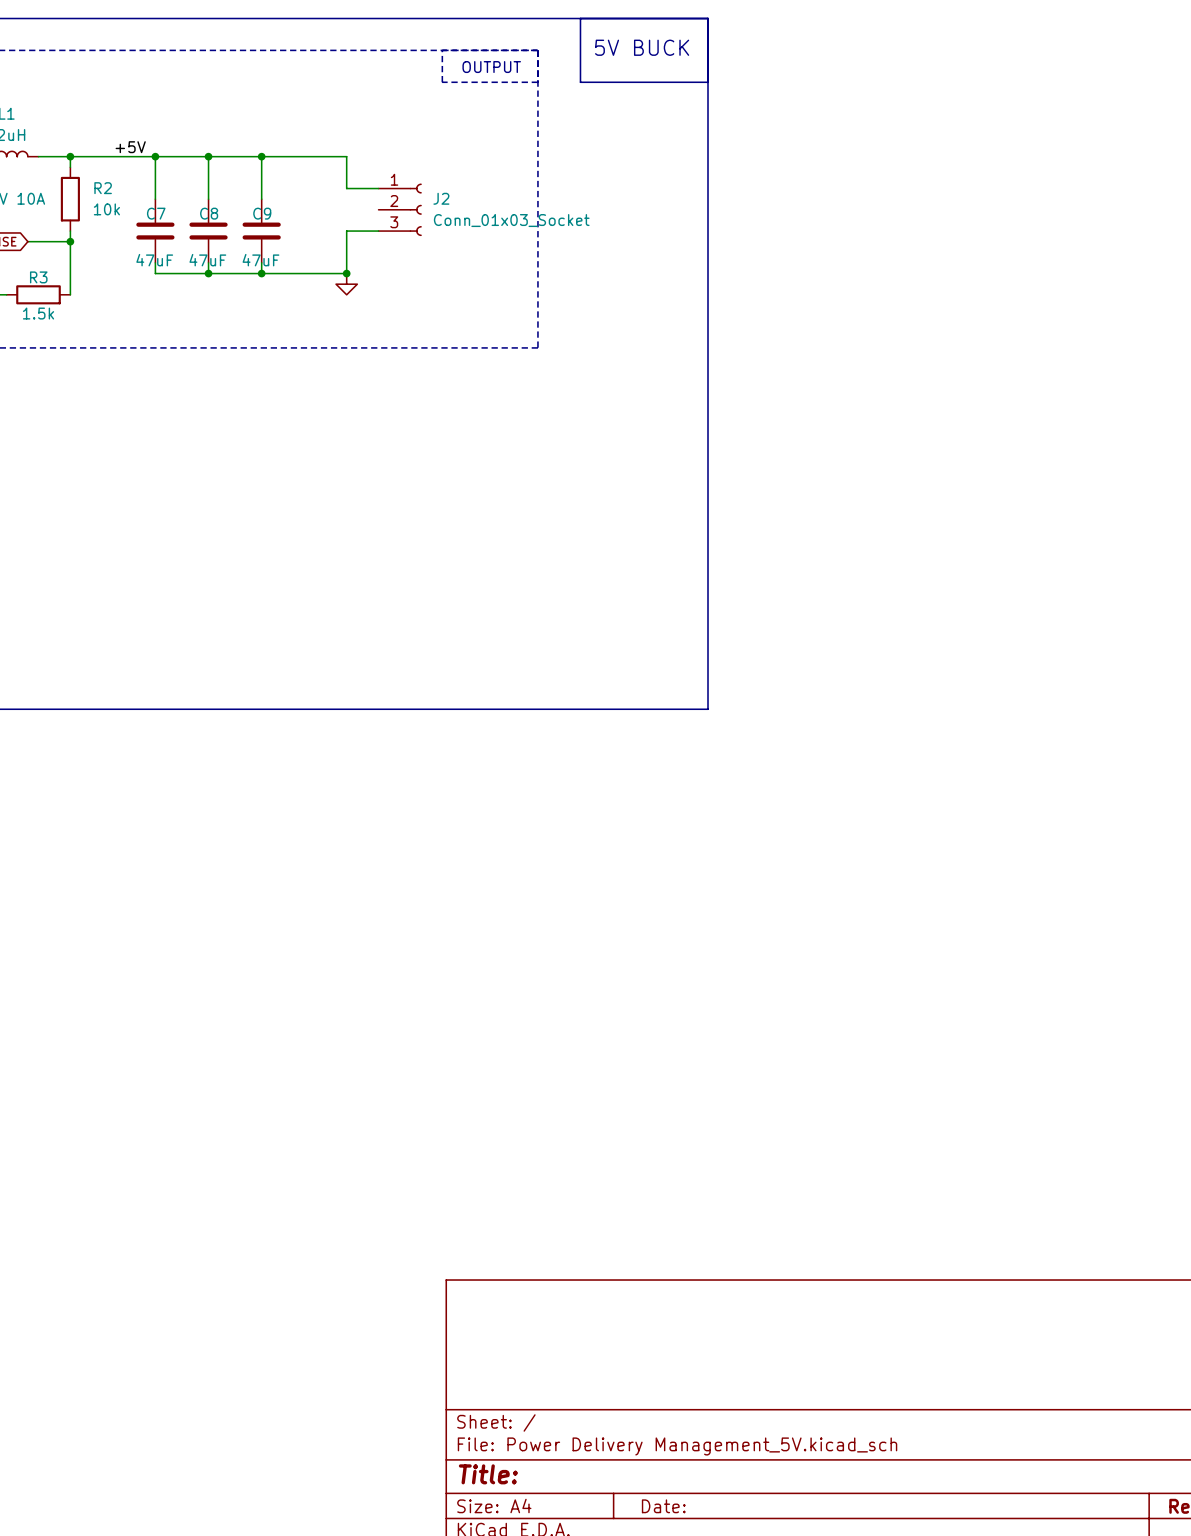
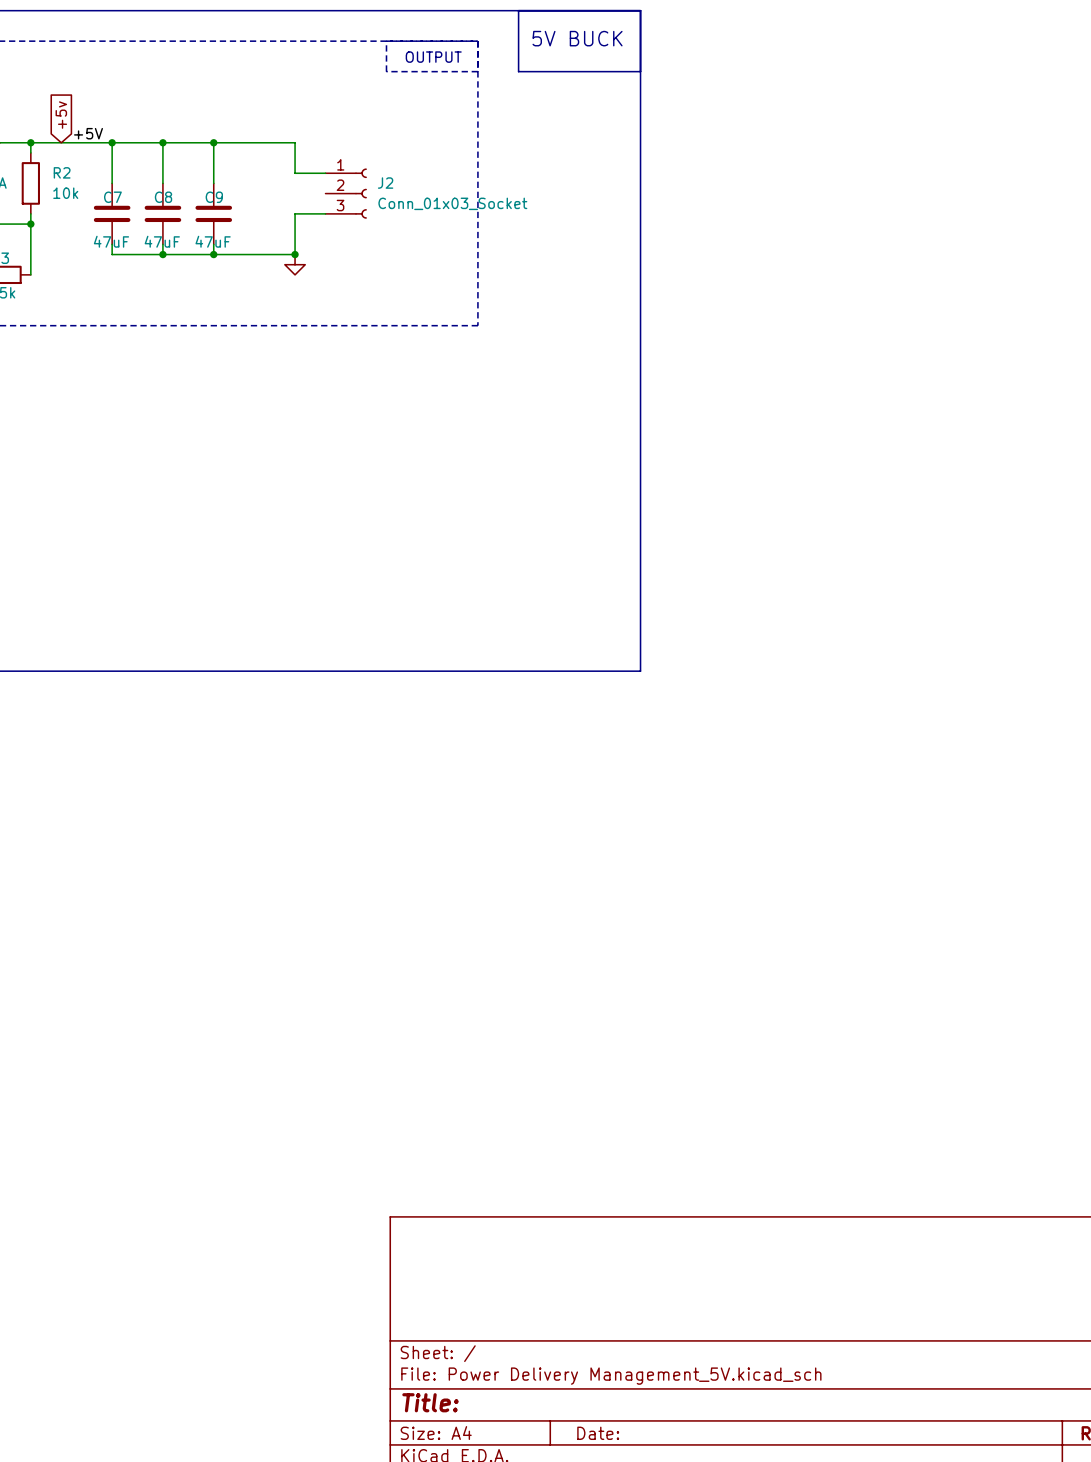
global label: none -> +5v (61, 115)

